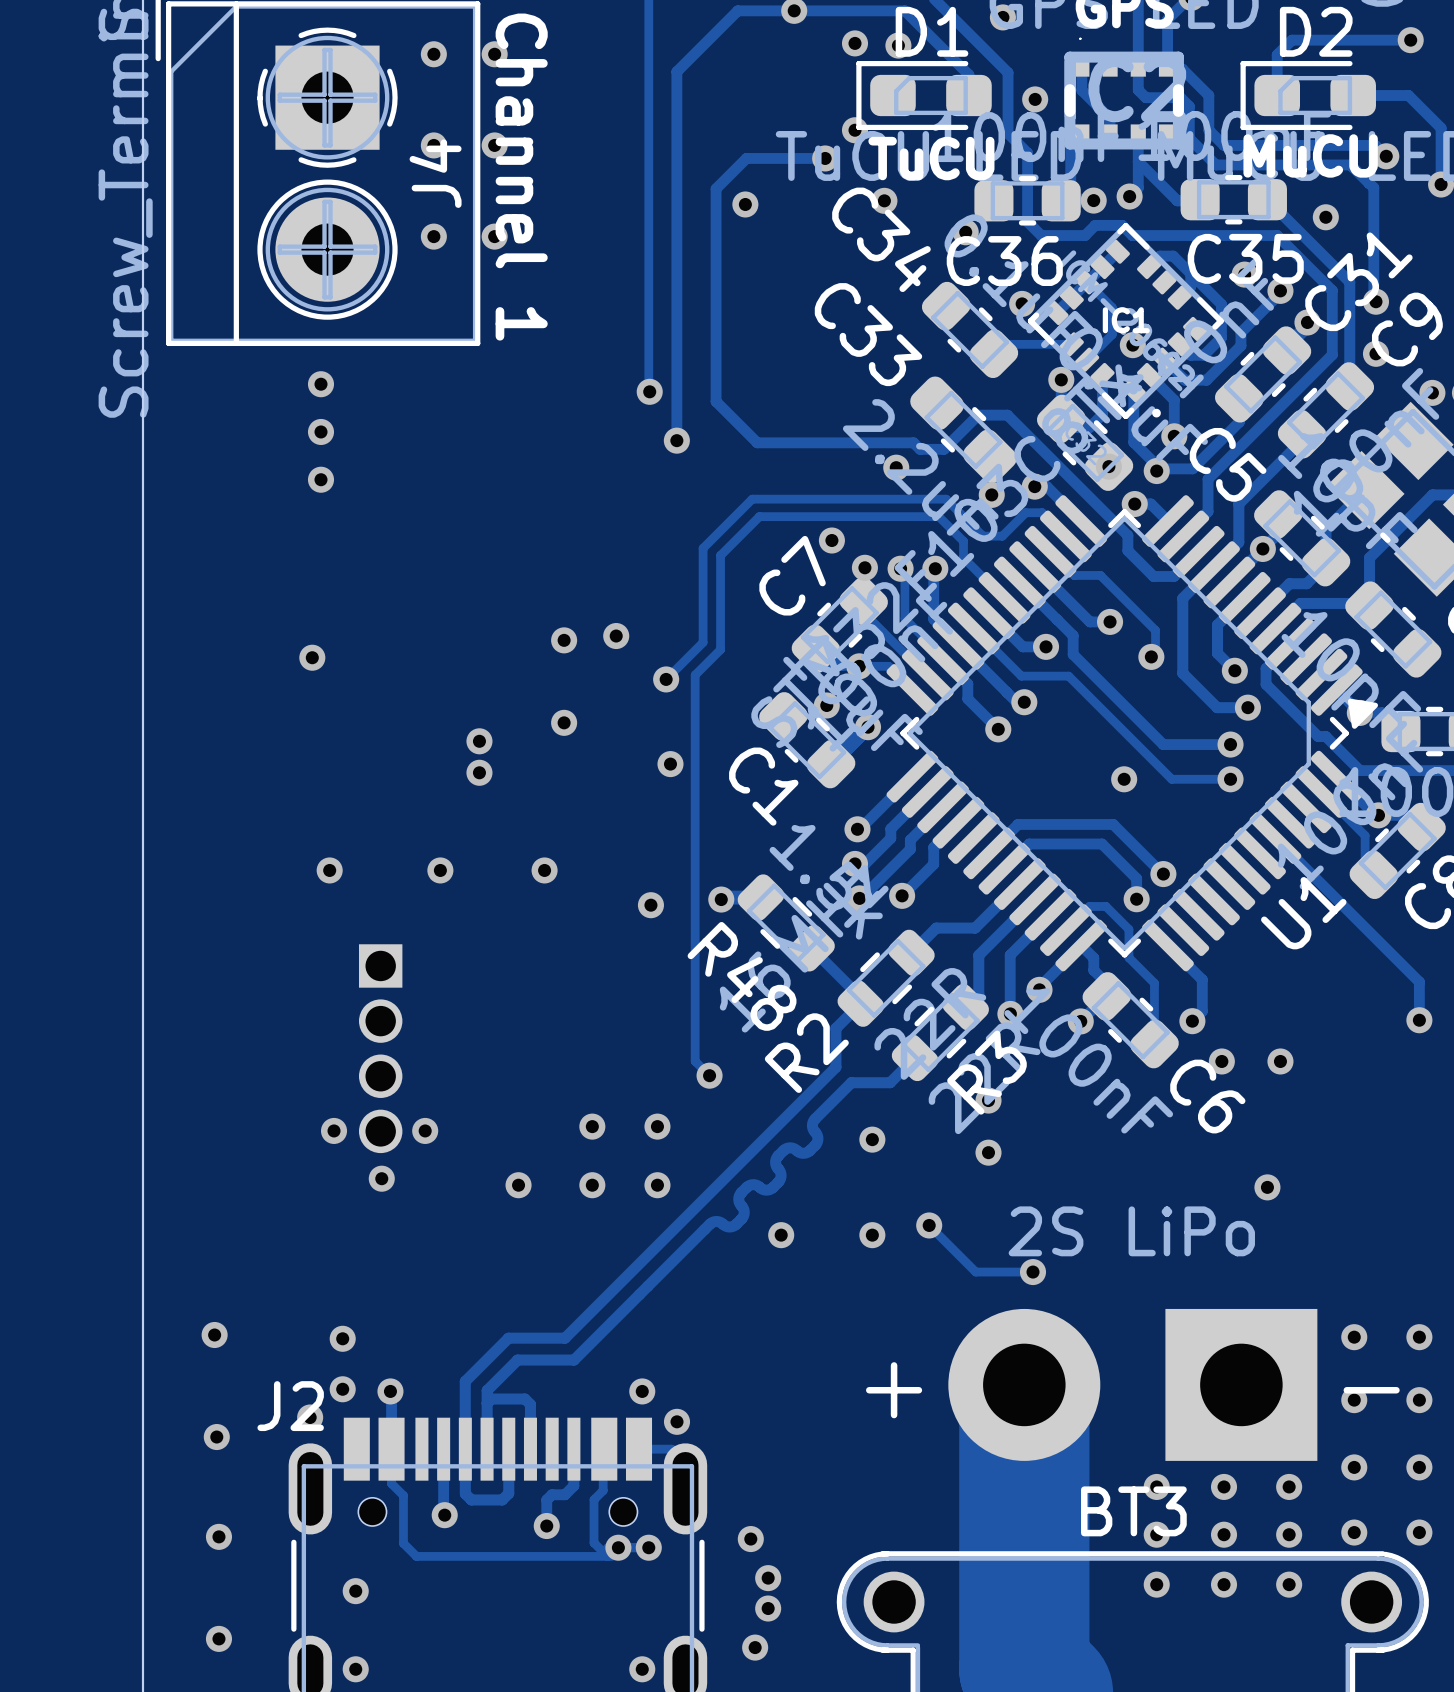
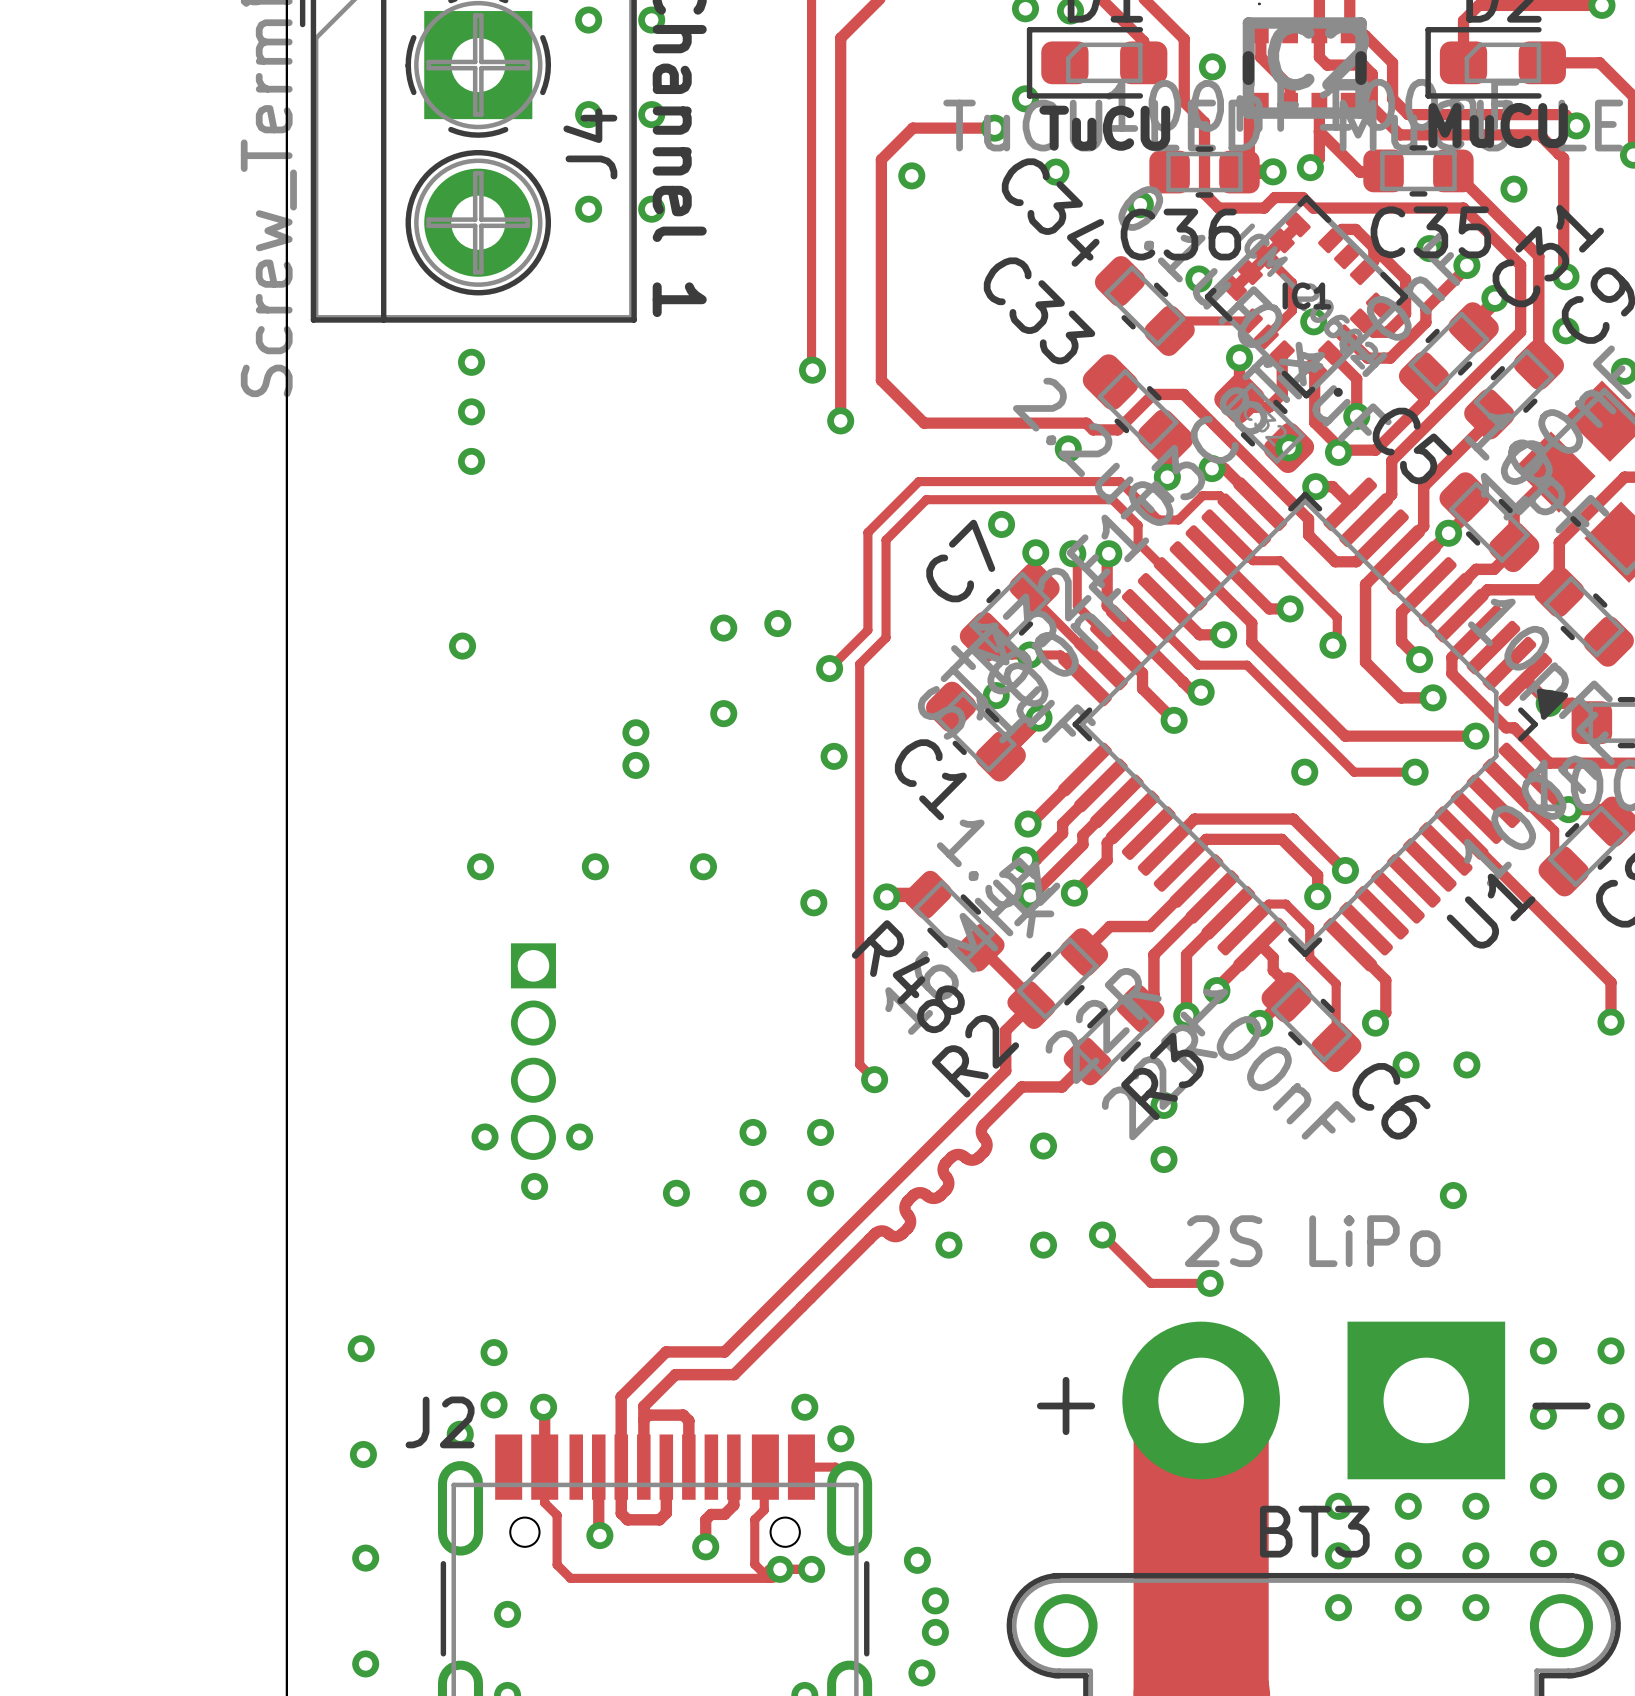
track: none -> (1415, 736) (1475, 736)
via position: (1230, 744) -> (1475, 736)

